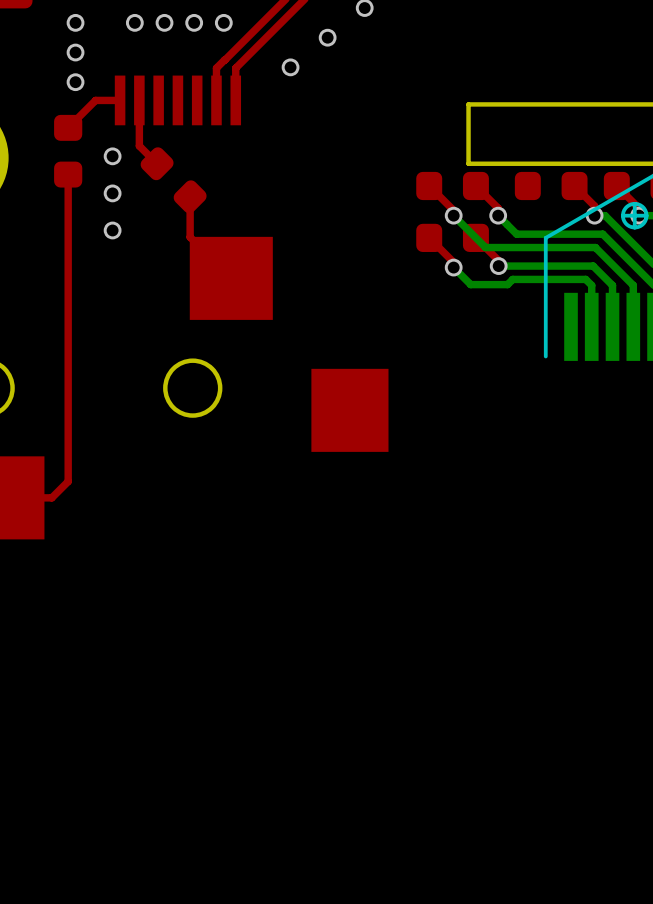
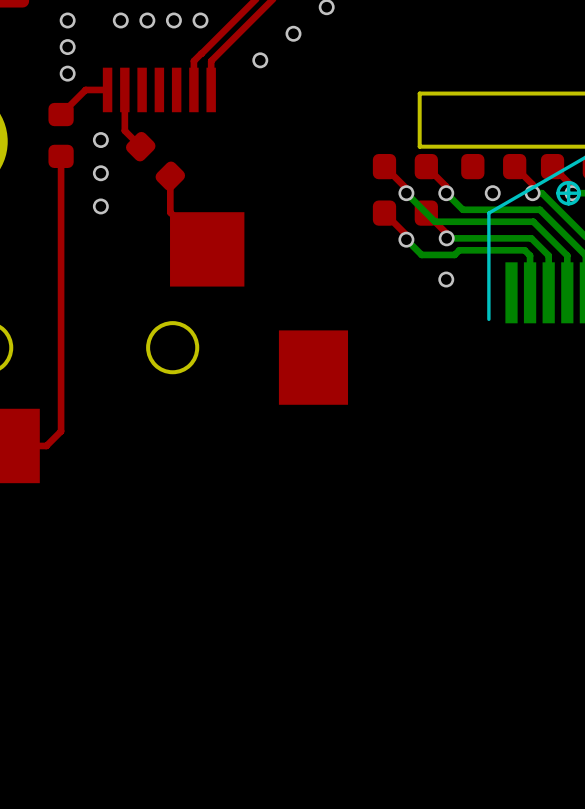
via: none -> (492, 193)
via: none -> (446, 279)

